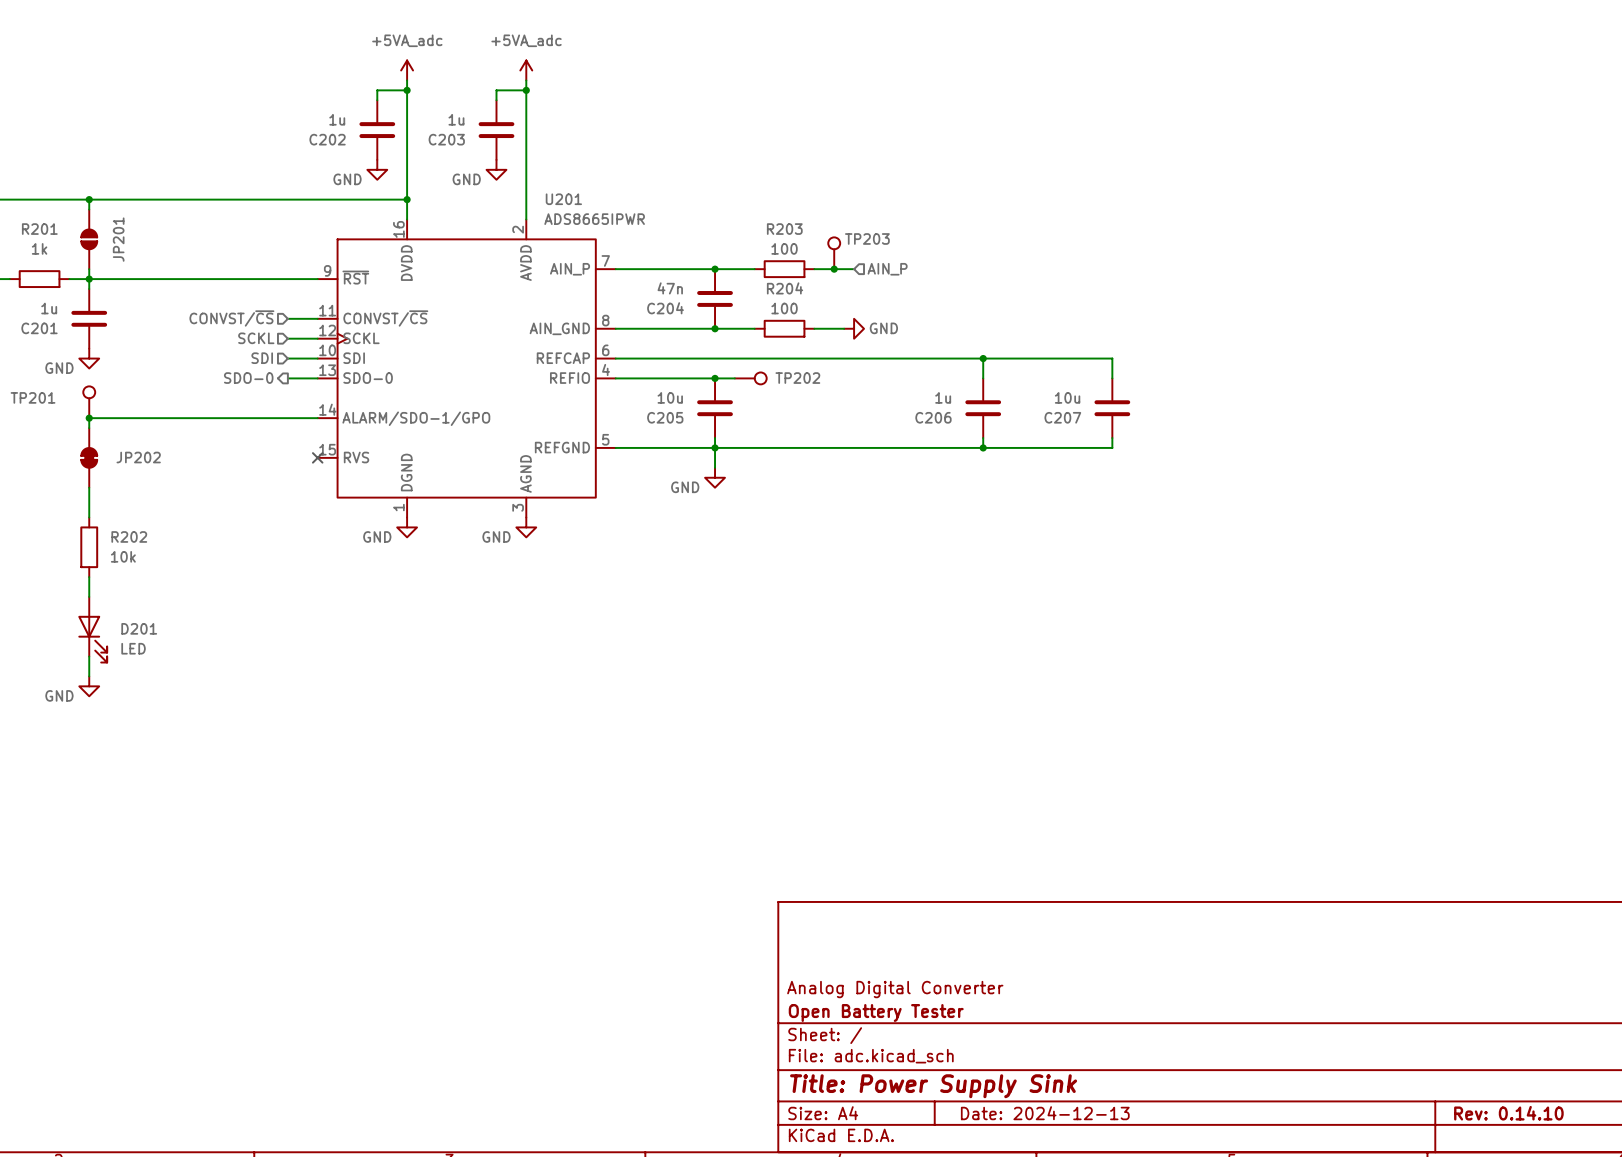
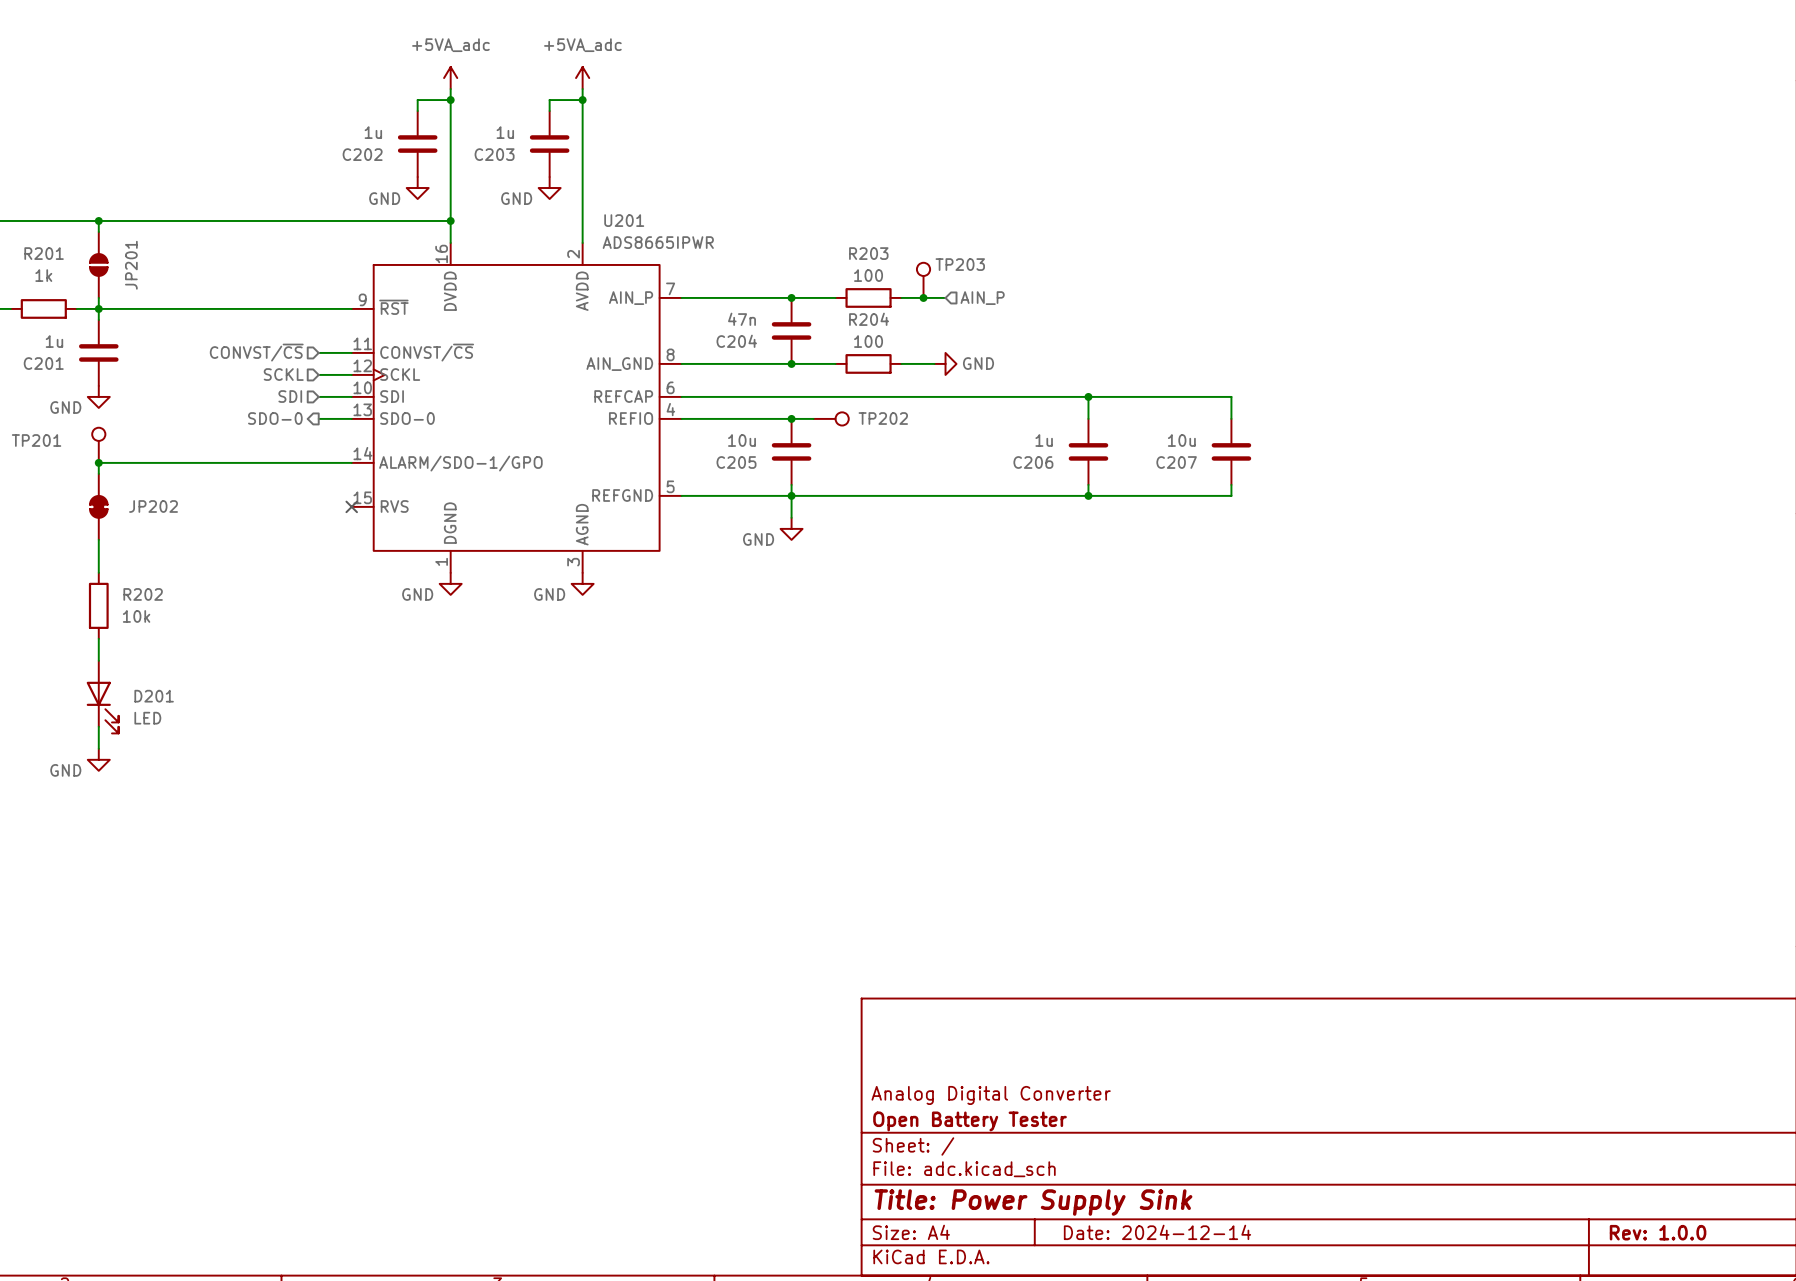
title block: Date: 2024-12-13 (1045, 1113) -> Date: 2024-12-14 (1157, 1232)
title block: Rev: 0.14.10 (1508, 1113) -> Rev: 1.0.0 (1658, 1232)

